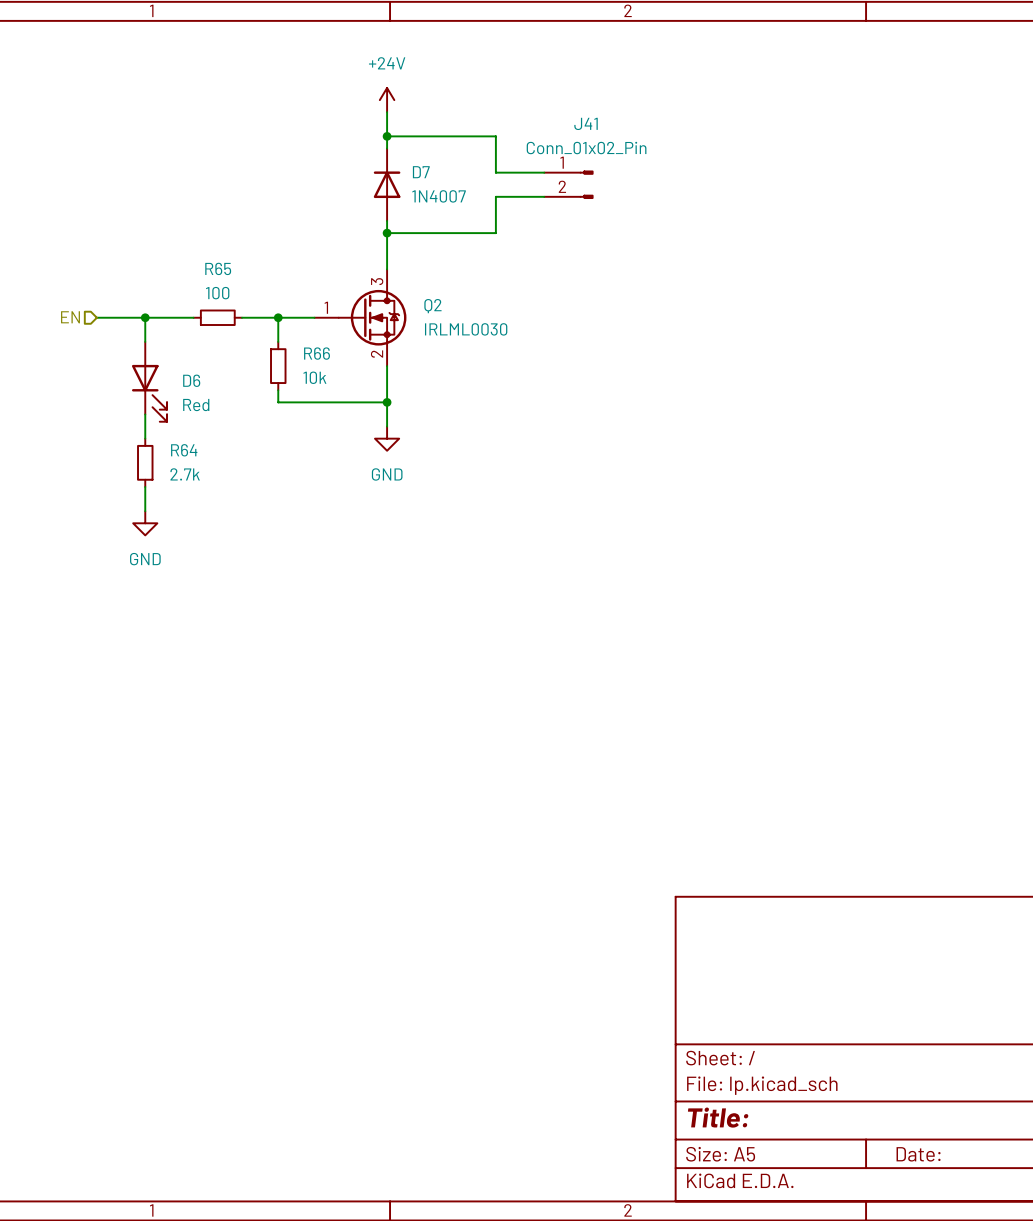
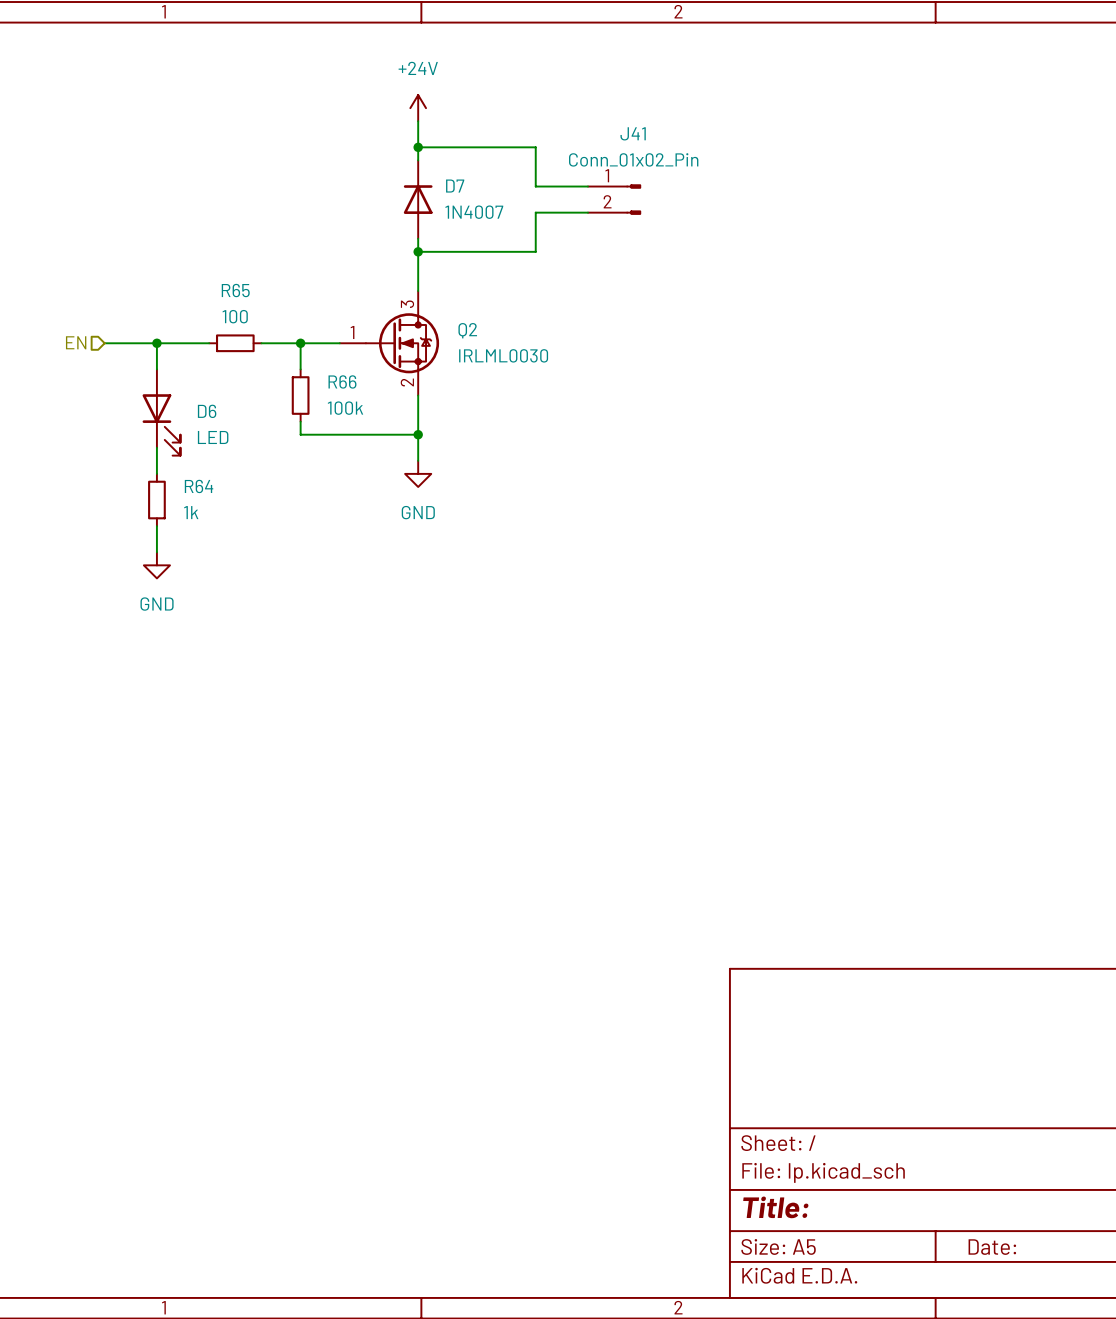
R66 value: 10k (314, 377) -> 100k (345, 408)
D6 value: Red (196, 405) -> LED (213, 437)
R64 value: 2.7k (185, 474) -> 1k (191, 512)

